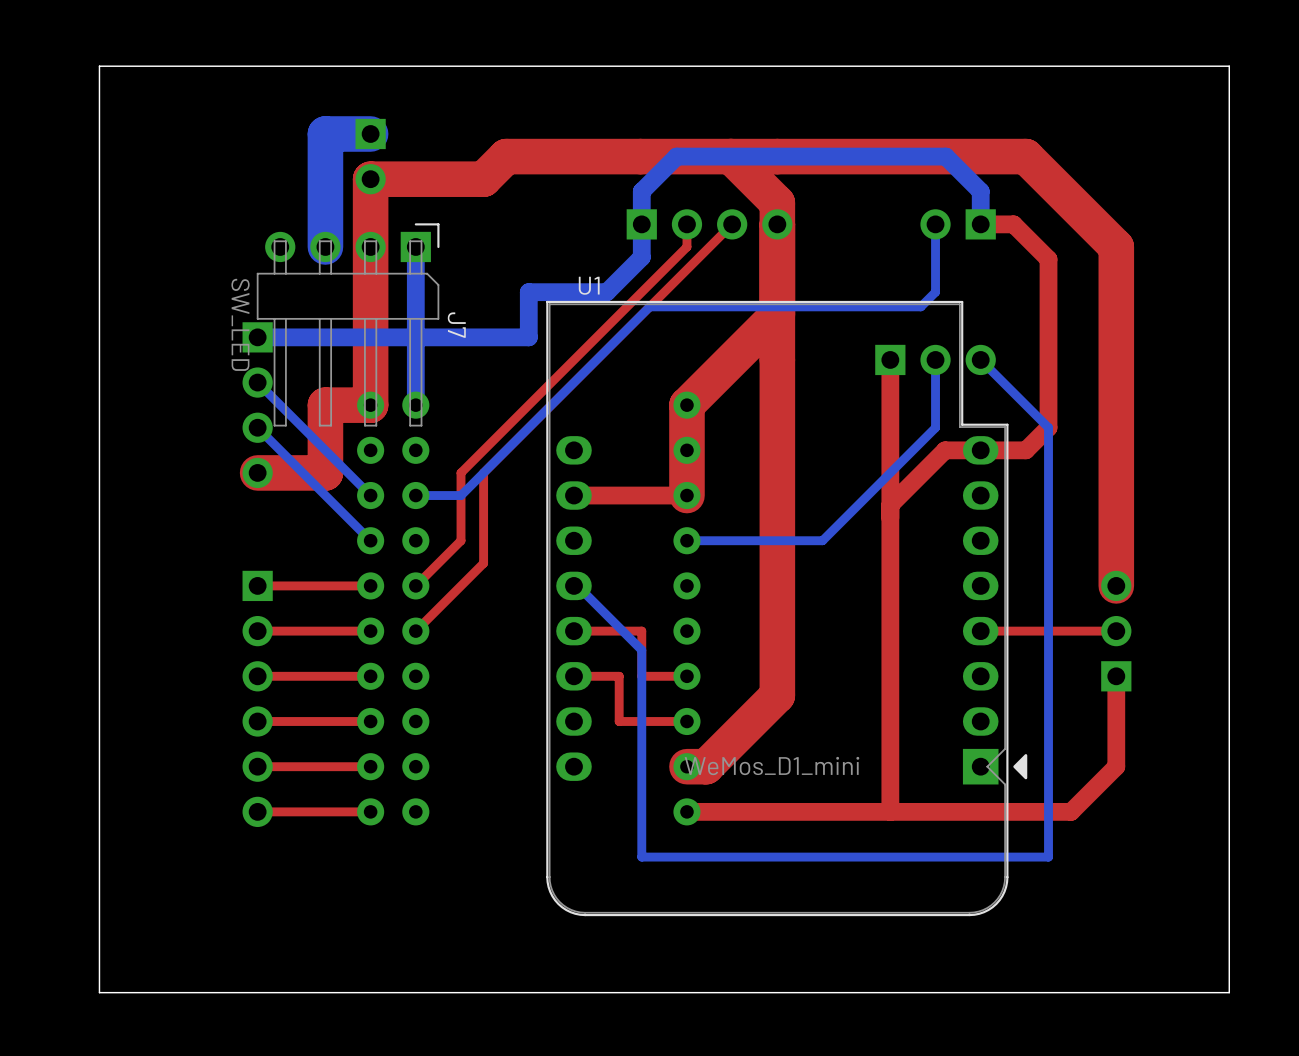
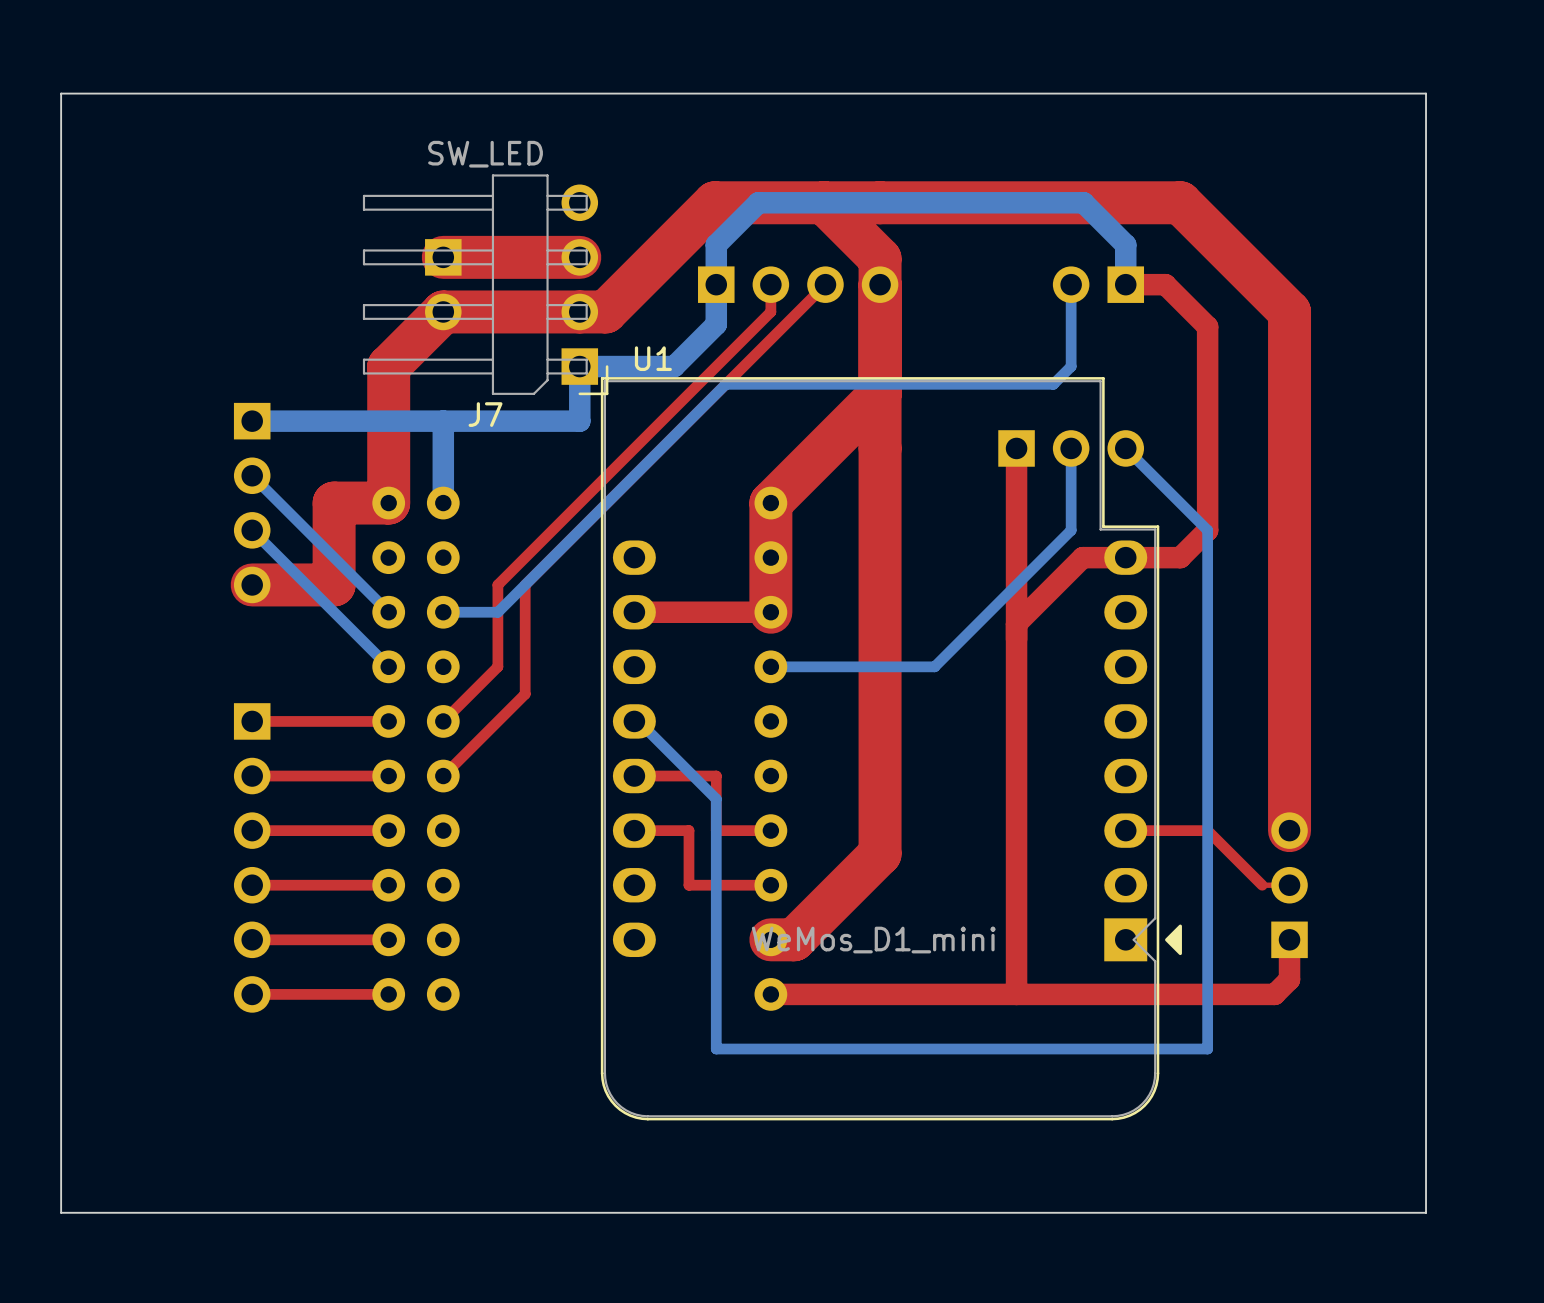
bottom track: (370, 133) (325, 133) (325, 246) -> none
part position: (370, 156) -> (443, 284)
top track: (640, 156) (506, 156) (483, 179) (370, 179) (370, 292) -> (714, 202) (605, 311) (443, 311) (388, 366)
top track: none -> (579, 257) (443, 257)
bottom track: (415, 246) (415, 337) -> none
J7 rotation: 0° (348, 324) -> 90° clockwise (485, 284)
J7 position: (348, 324) -> (485, 284)
top track: none -> (1289, 721) (1289, 830)
top track: (1093, 631) (1116, 631) (980, 631) -> none
part position: (1116, 631) -> (1289, 885)
top track: none -> (1125, 830) (1207, 830) (1262, 885) (1289, 885)
top track: (1116, 676) (1116, 766) (1071, 811) -> (1289, 939) (1289, 979) (1274, 994) (1234, 994)

